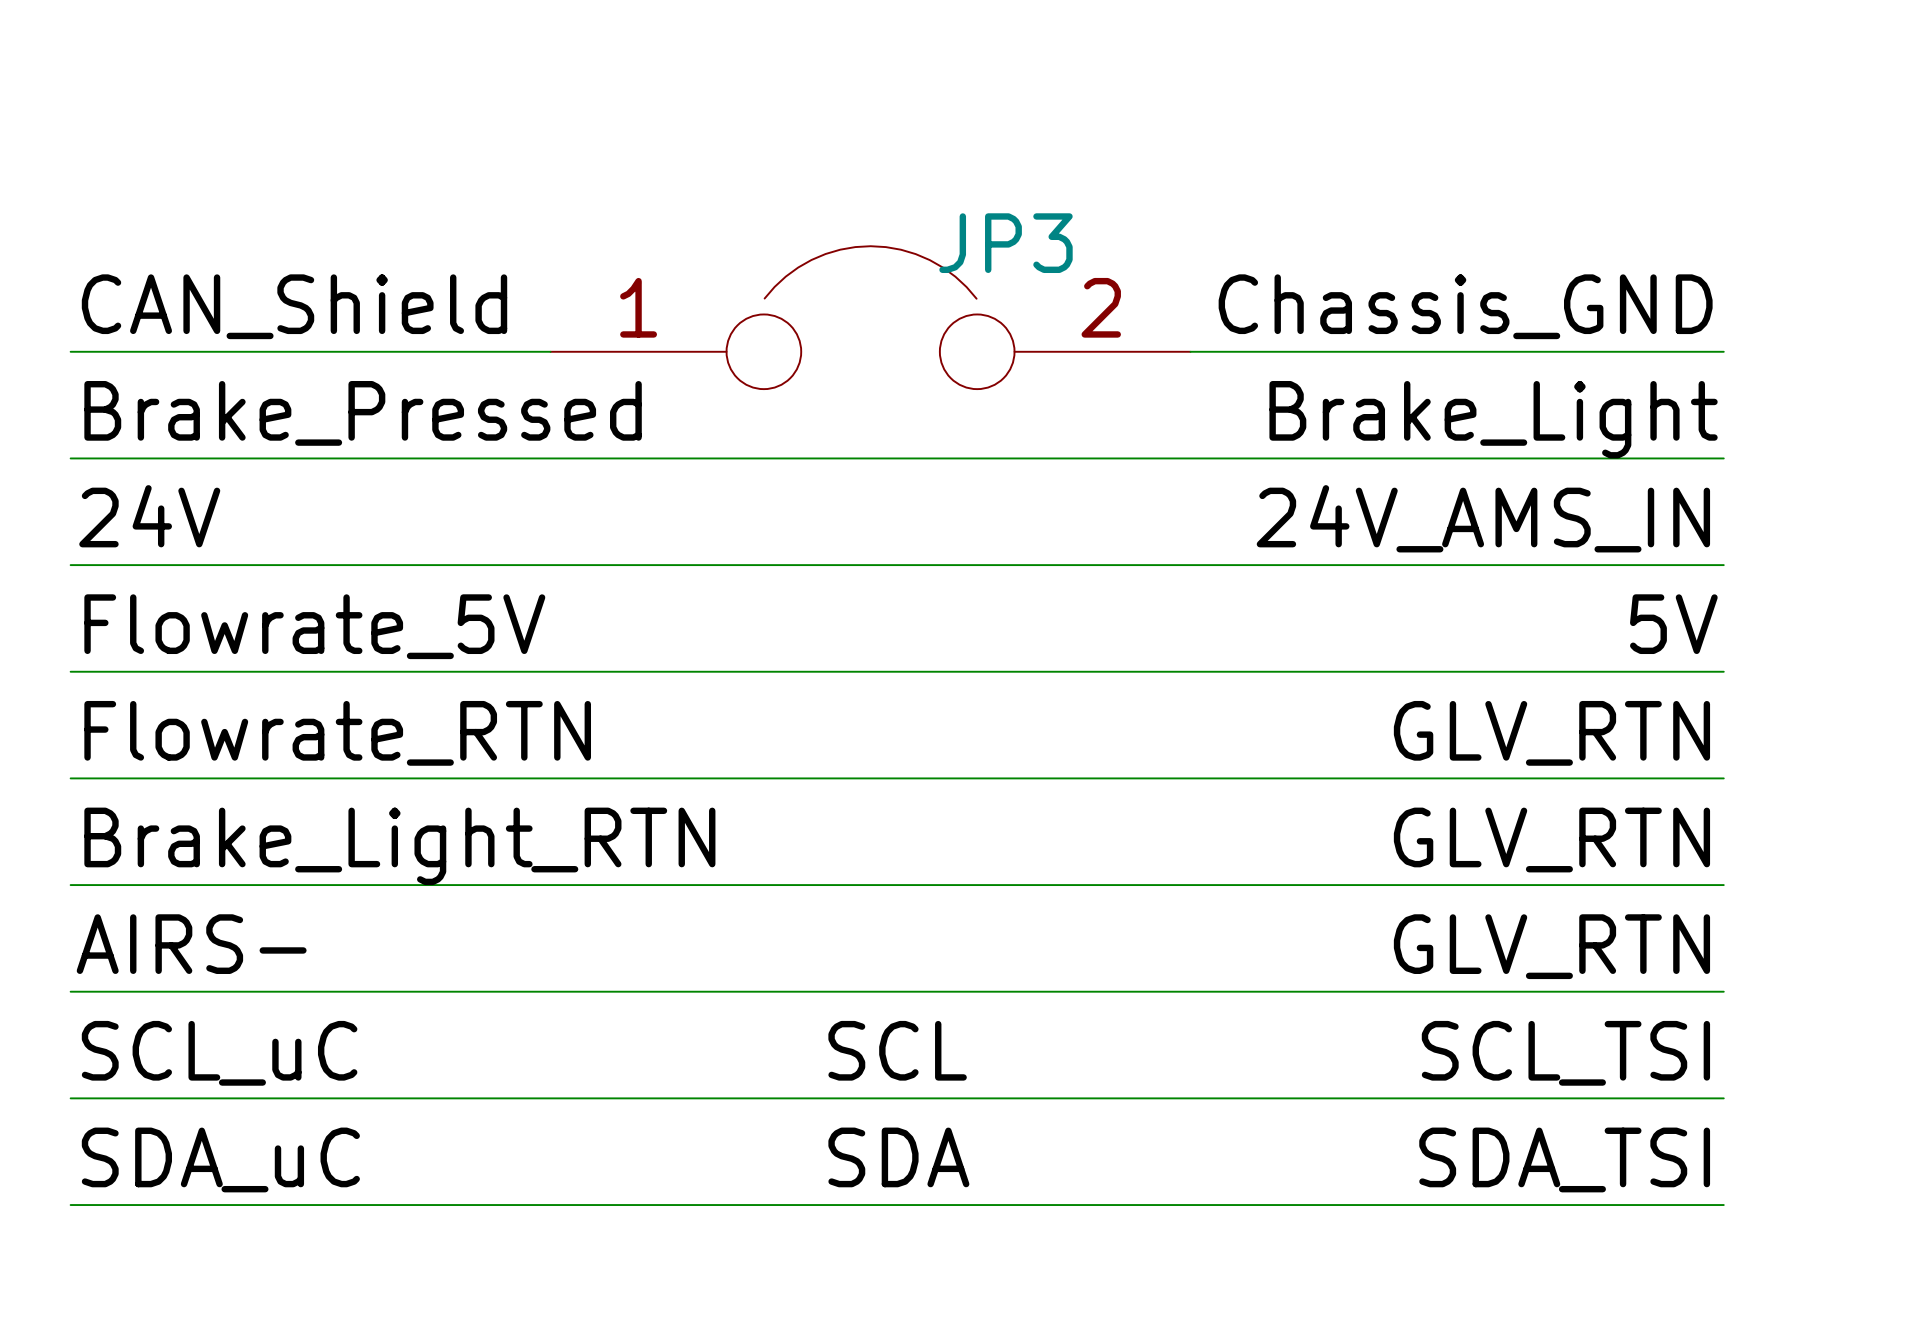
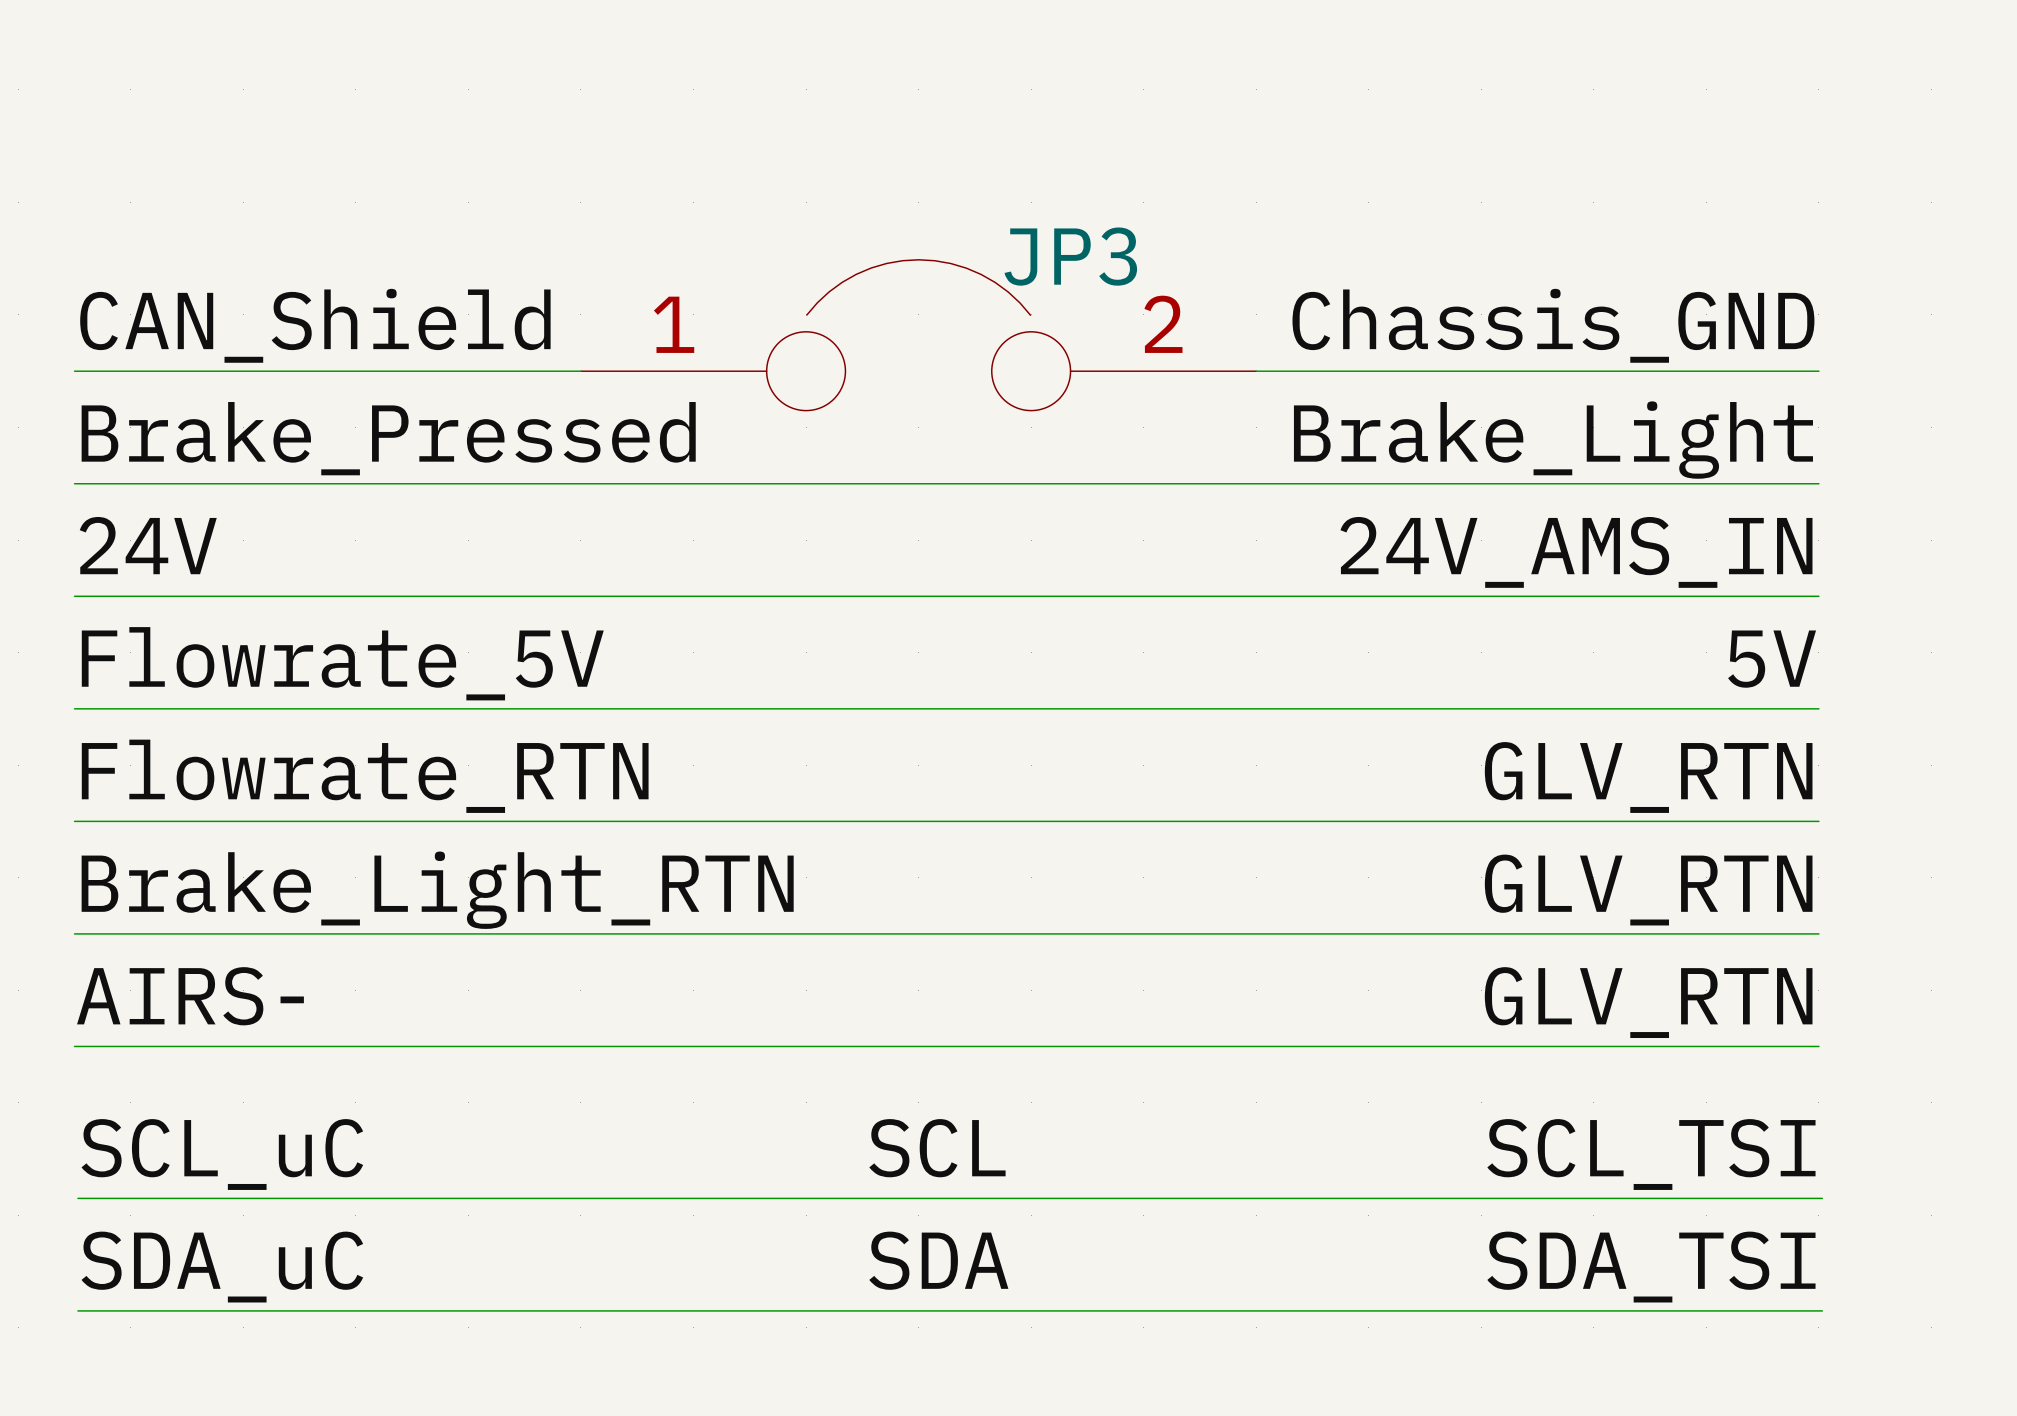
label position: SCL (897, 1050) -> SCL (937, 1148)
label position: SCL_uC (219, 1053) -> SCL_uC (222, 1154)
label position: SCL_TSI (1565, 1053) -> SCL_TSI (1651, 1154)
wire: (70, 1098) (1723, 1098) -> (77, 1198) (1822, 1198)
label position: SDA (898, 1157) -> SDA (938, 1260)
label position: SDA_uC (220, 1159) -> SDA_uC (222, 1267)
label position: SDA_TSI (1564, 1159) -> SDA_TSI (1651, 1267)
wire: (70, 1205) (1723, 1205) -> (77, 1310) (1822, 1310)

